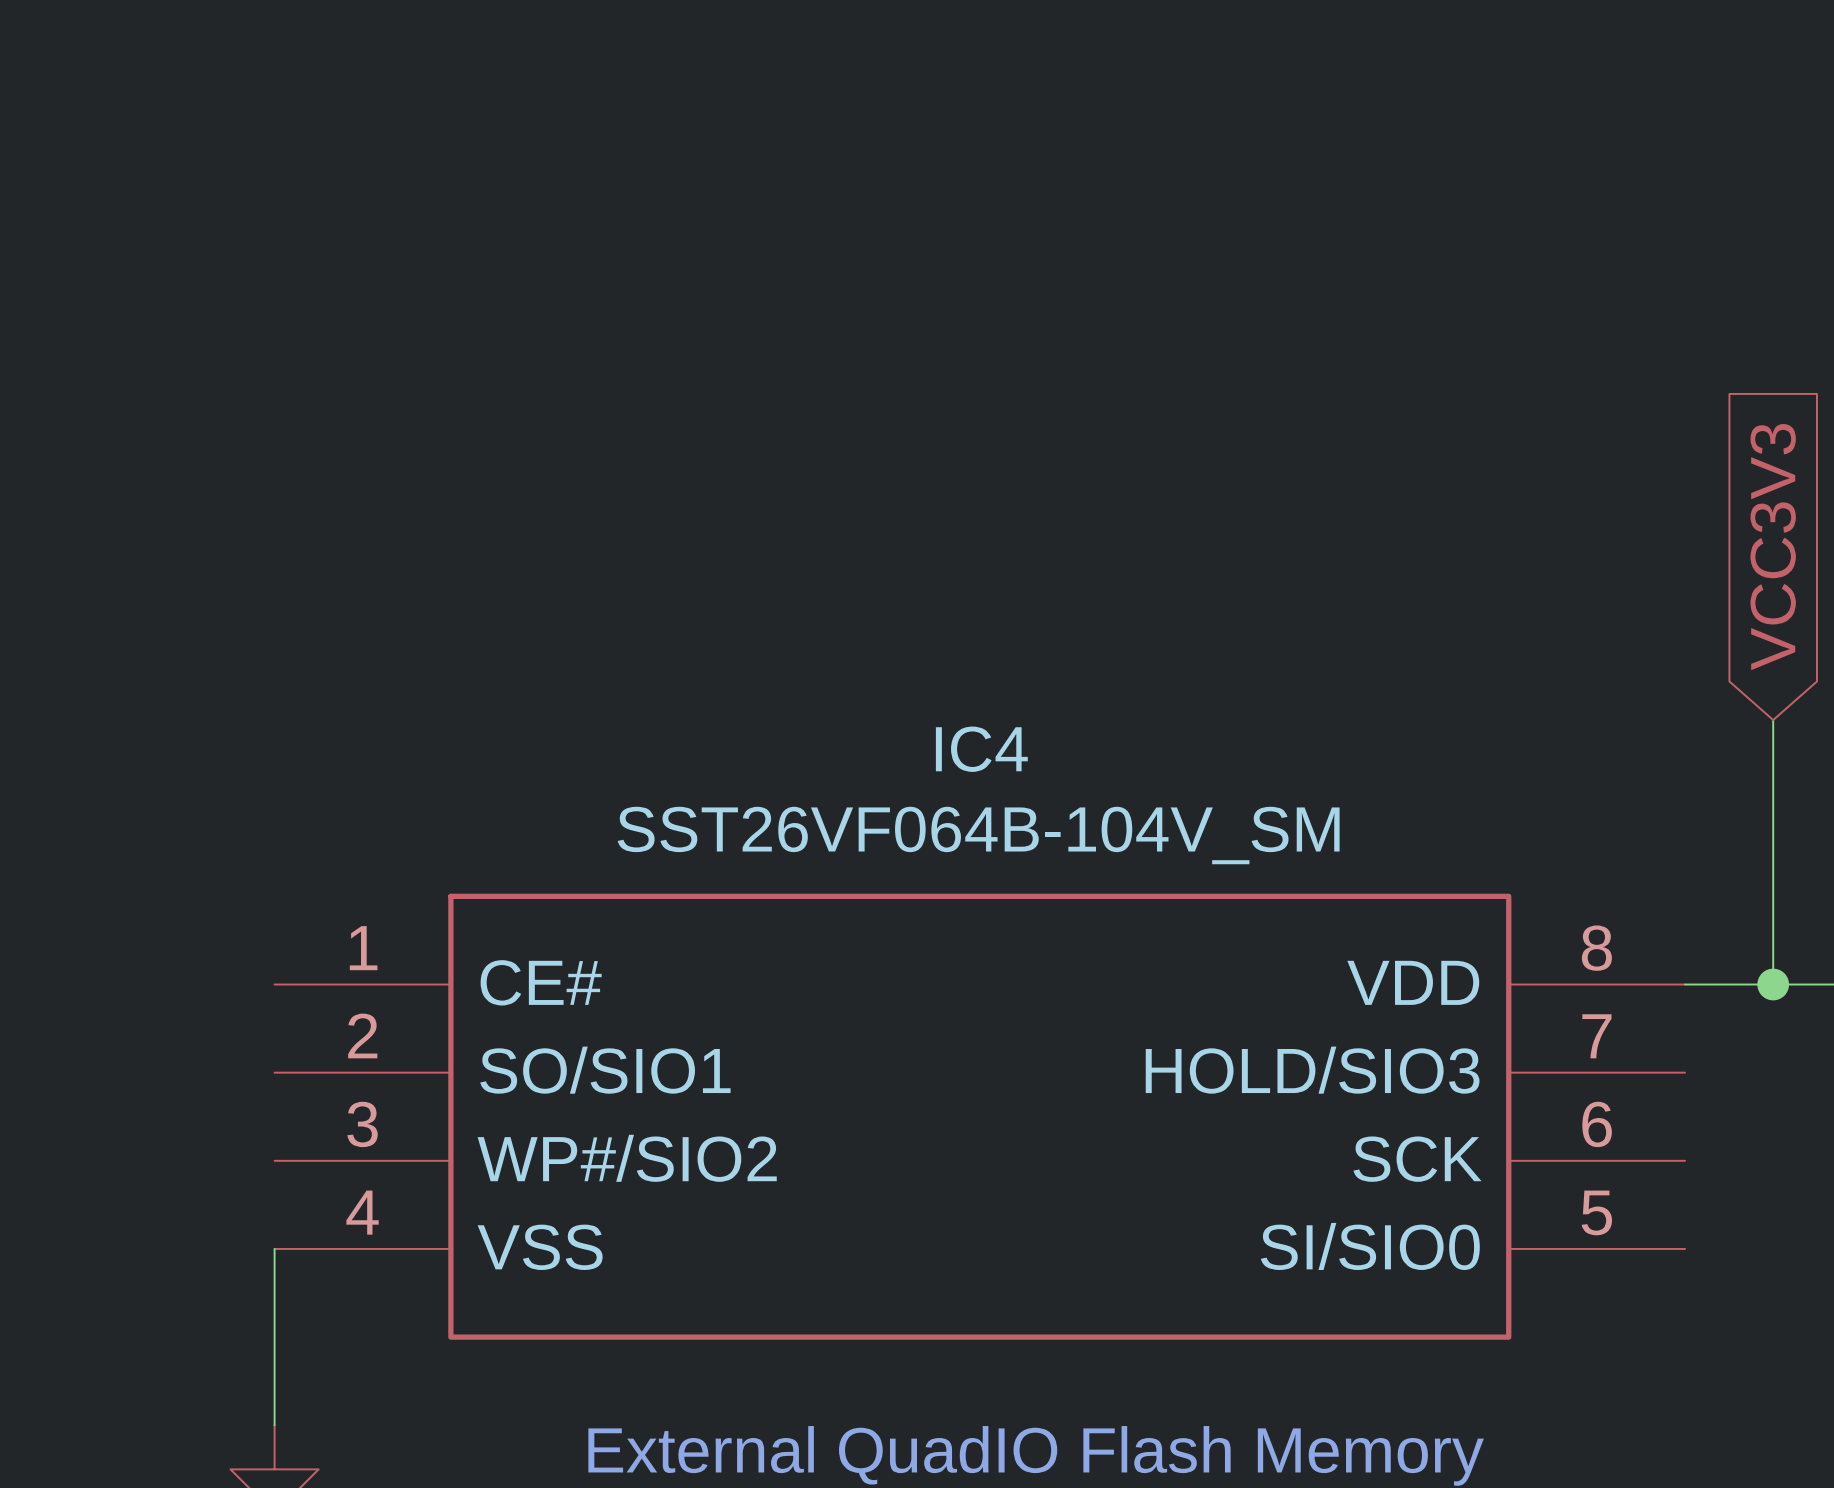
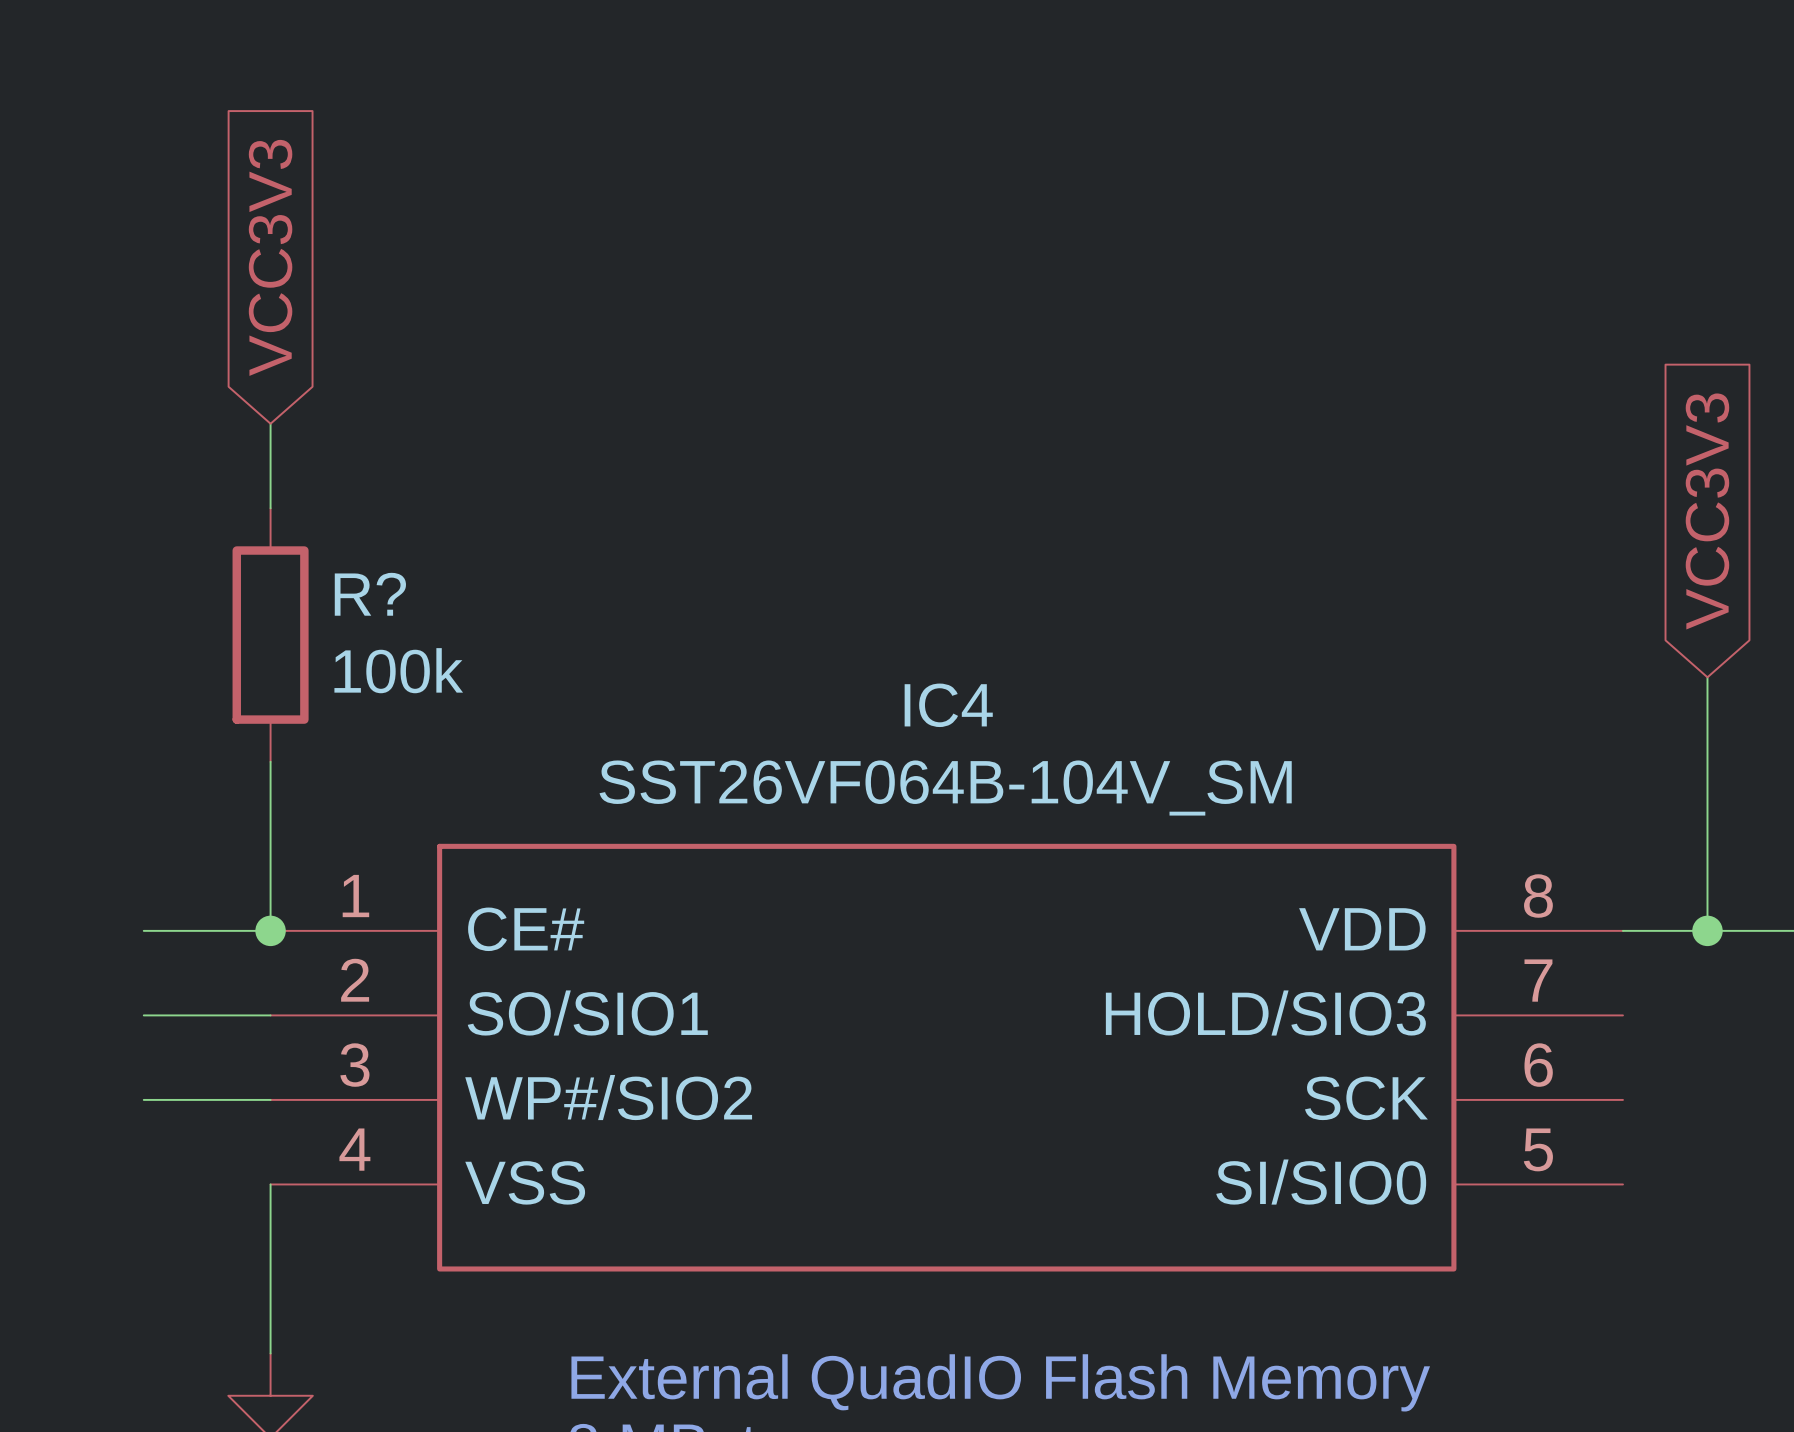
global label: none -> VCC3V3 (270, 257)
wire: none -> (270, 423) (270, 508)
R?: none -> 100k (270, 635)
wire: none -> (270, 761) (270, 930) (143, 930)
junction: none -> (270, 930)
wire: none -> (143, 1015) (270, 1015)
wire: none -> (143, 1099) (270, 1099)

